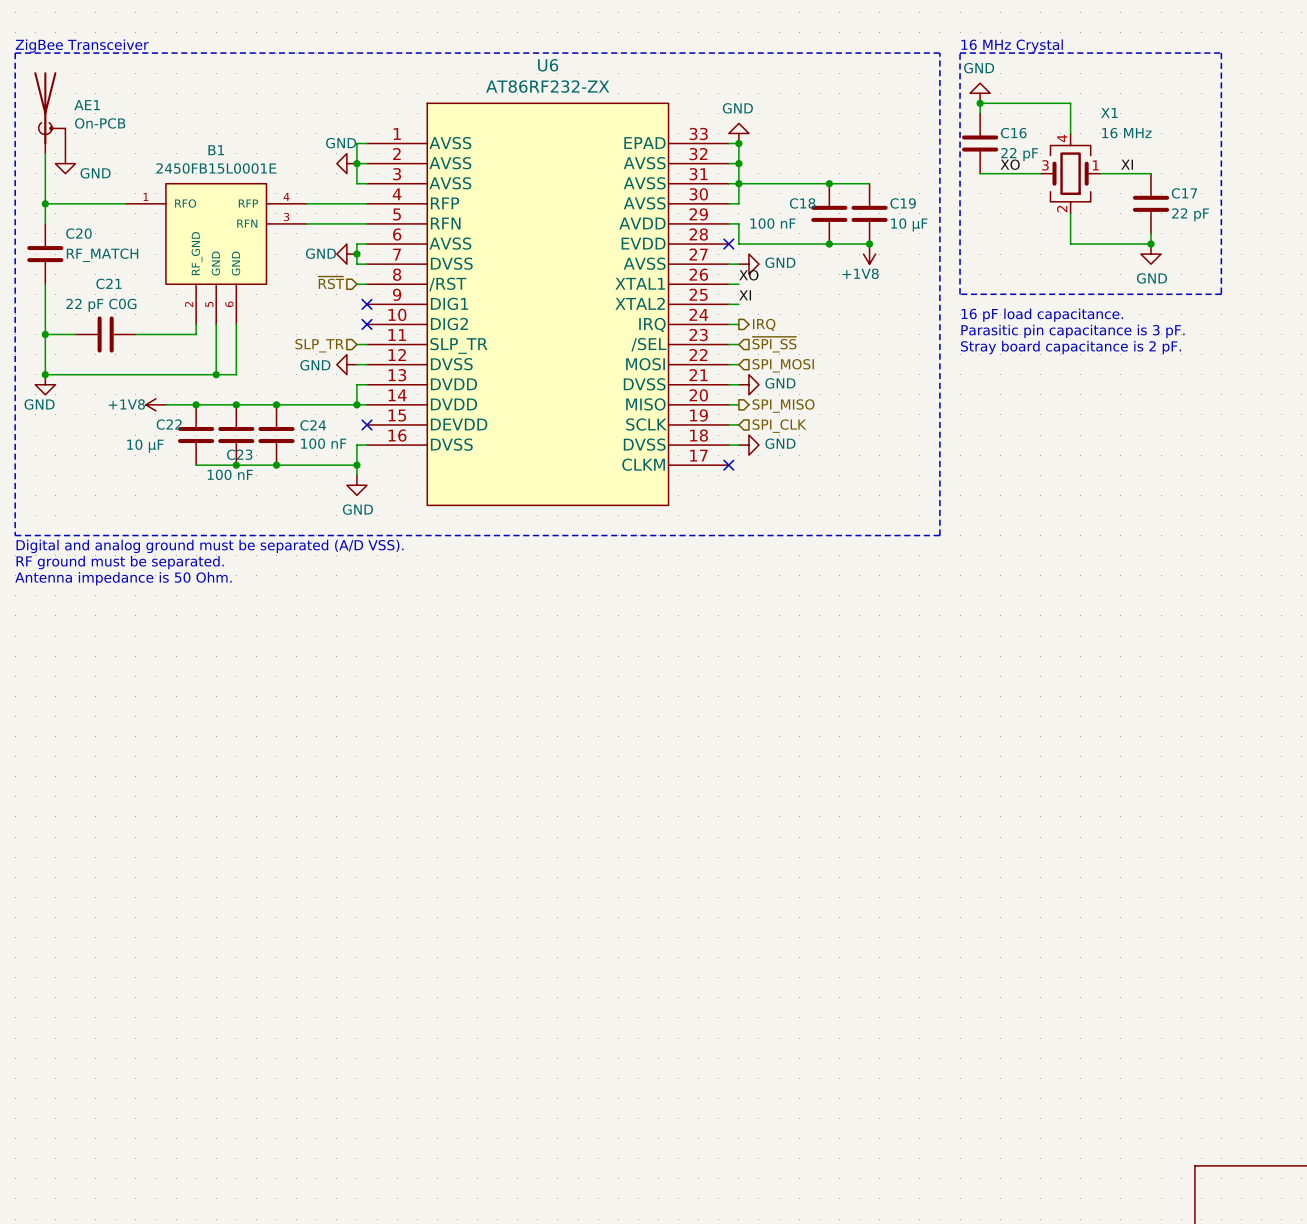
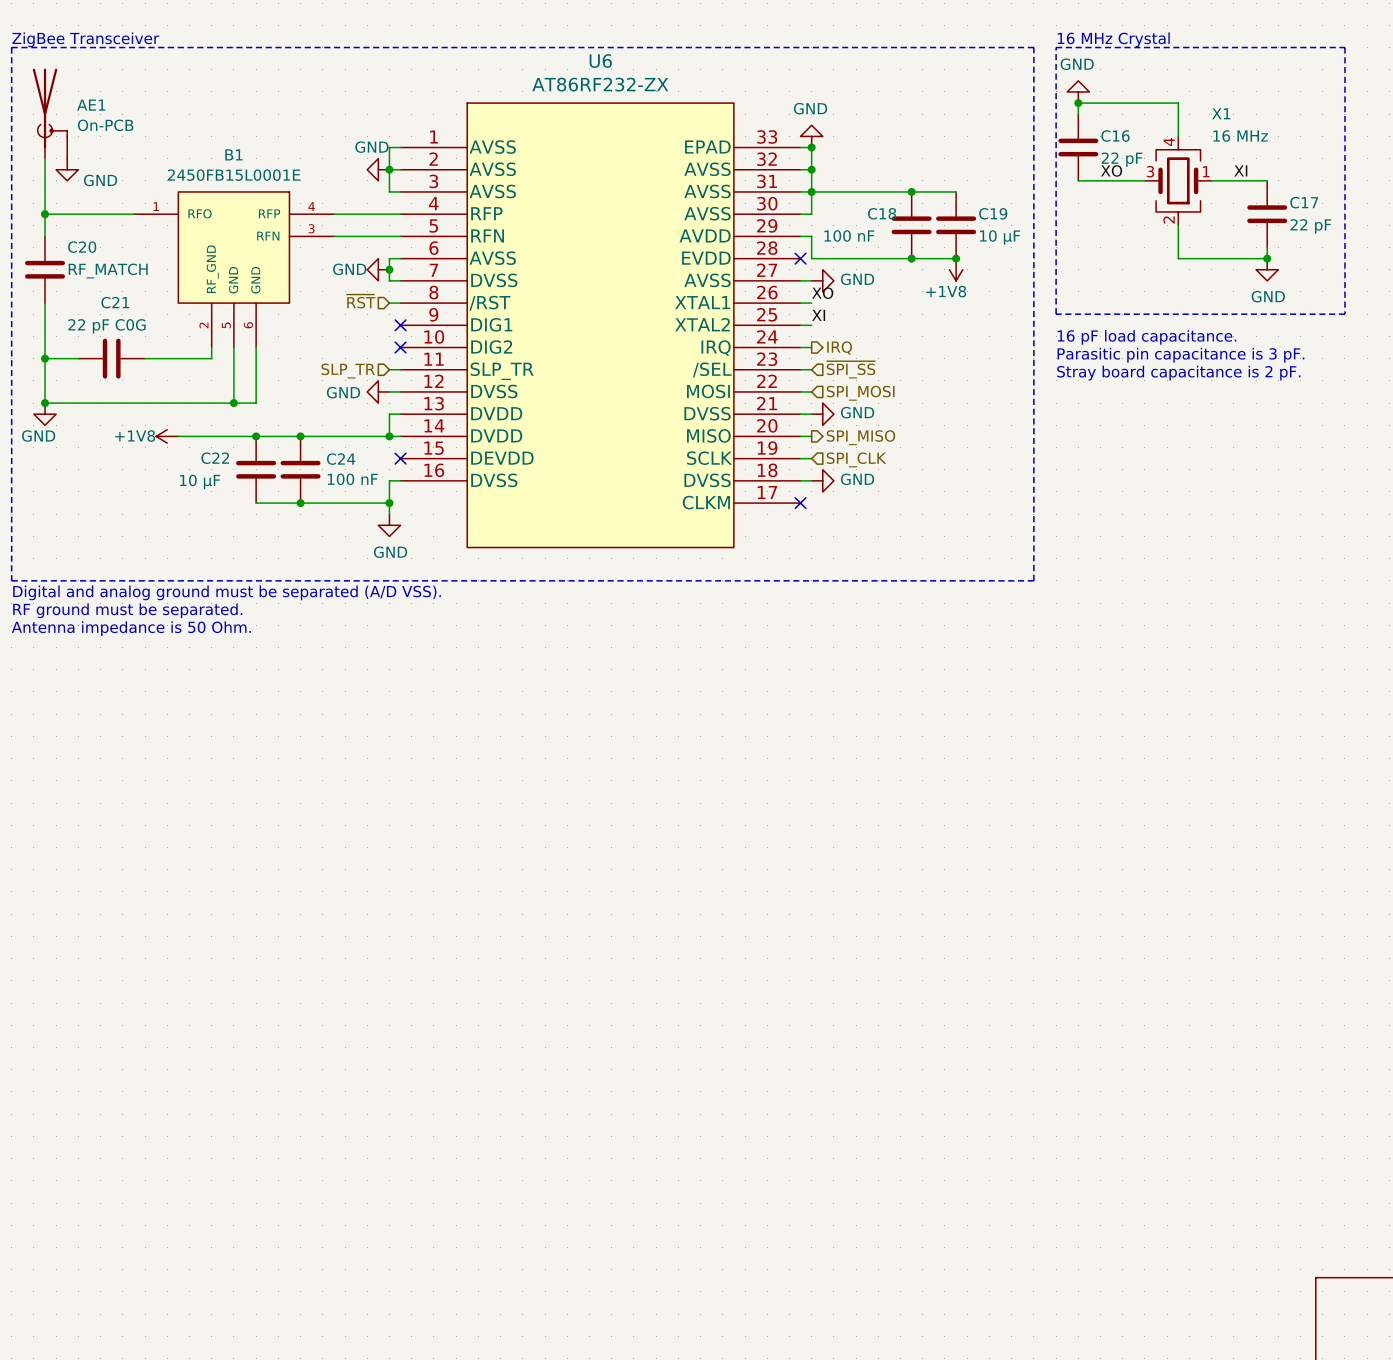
junction: (196, 404) -> none
C22: 10 µF (196, 435) -> none
C23 name: C23 (239, 454) -> C22 (215, 458)
wire: (196, 465) (236, 465) -> none
junction: (236, 465) -> none
C23 value: 100 nF (230, 474) -> 10 µF (200, 481)

